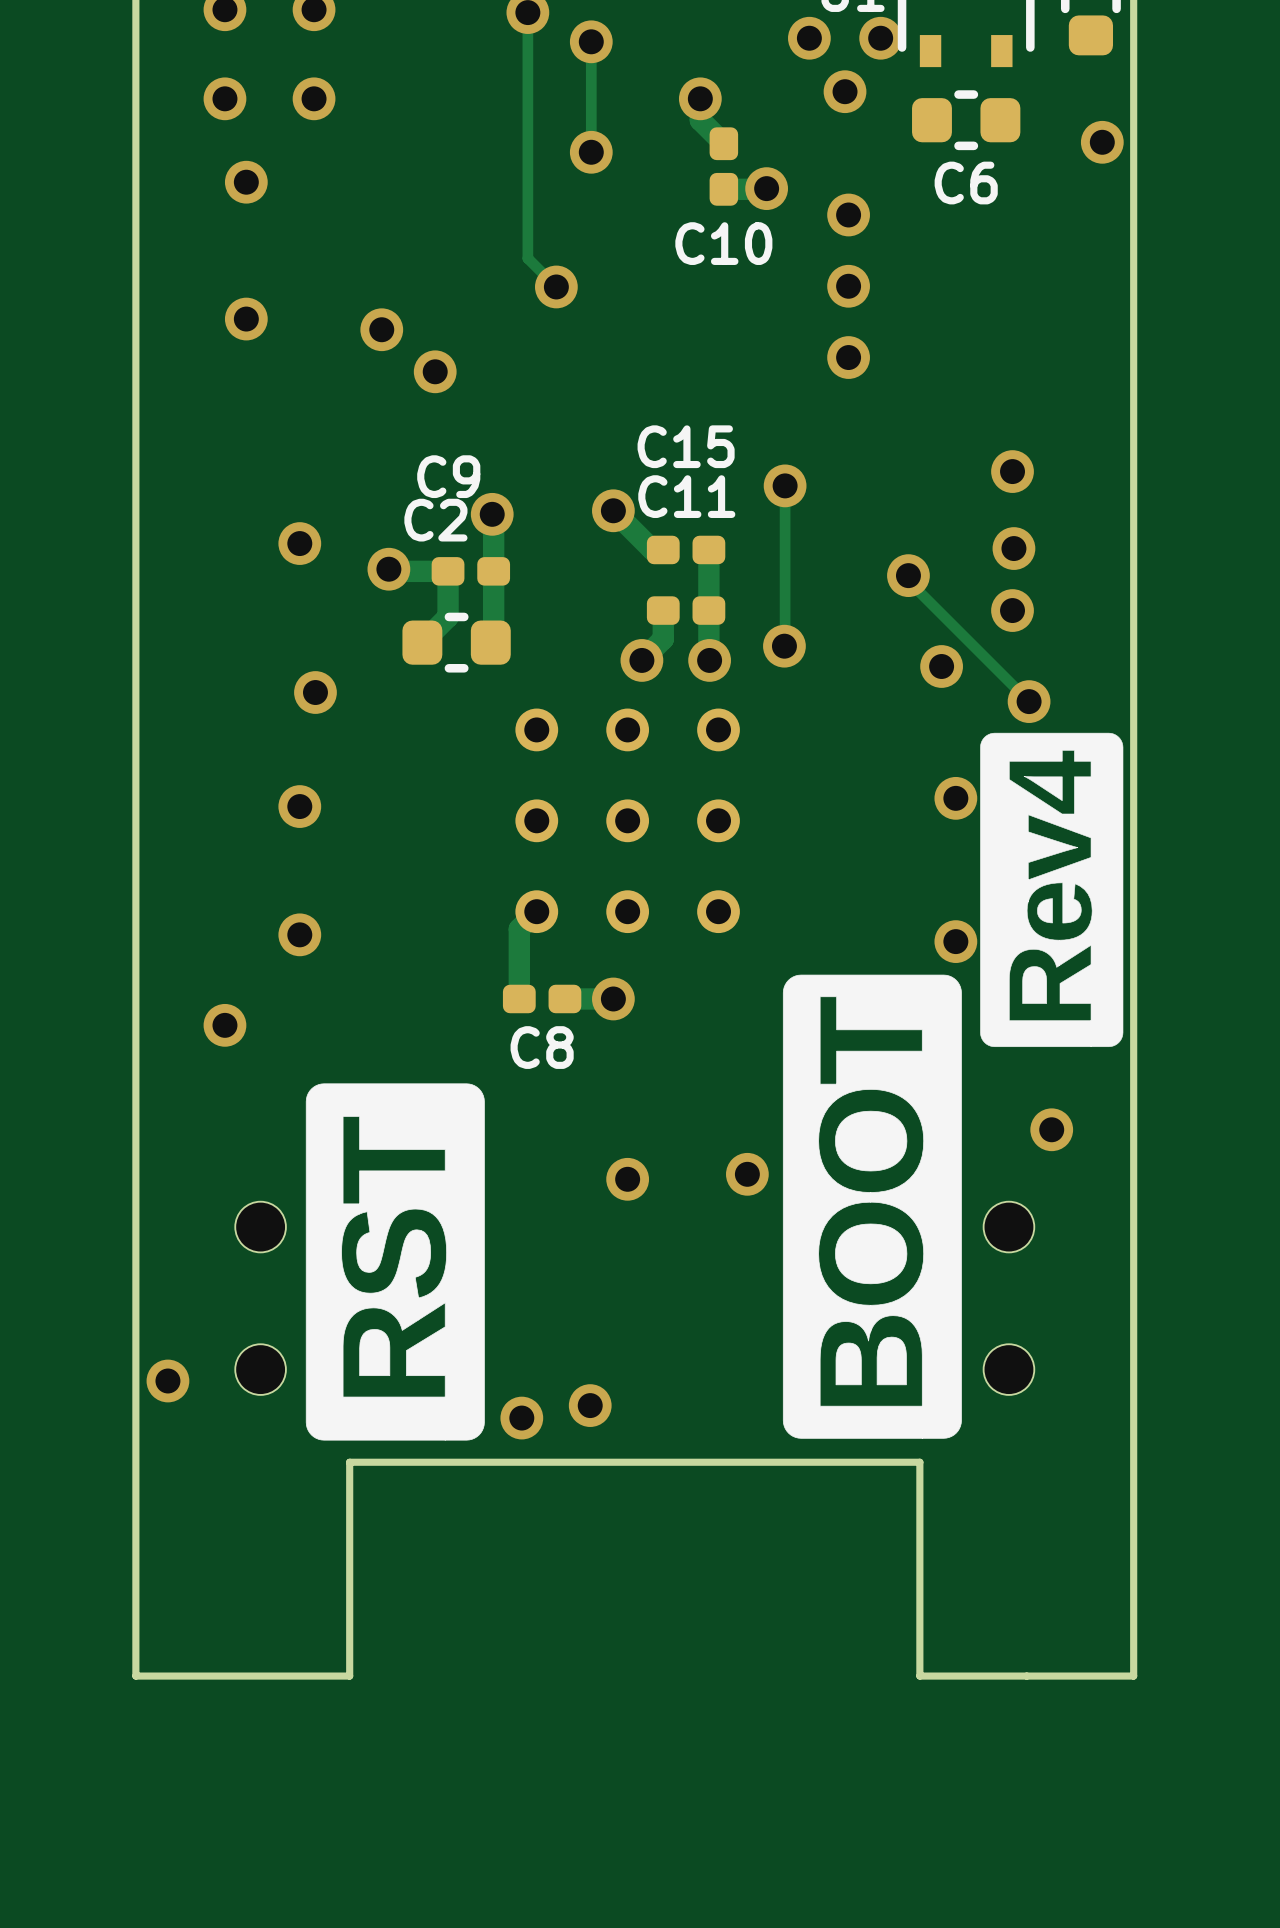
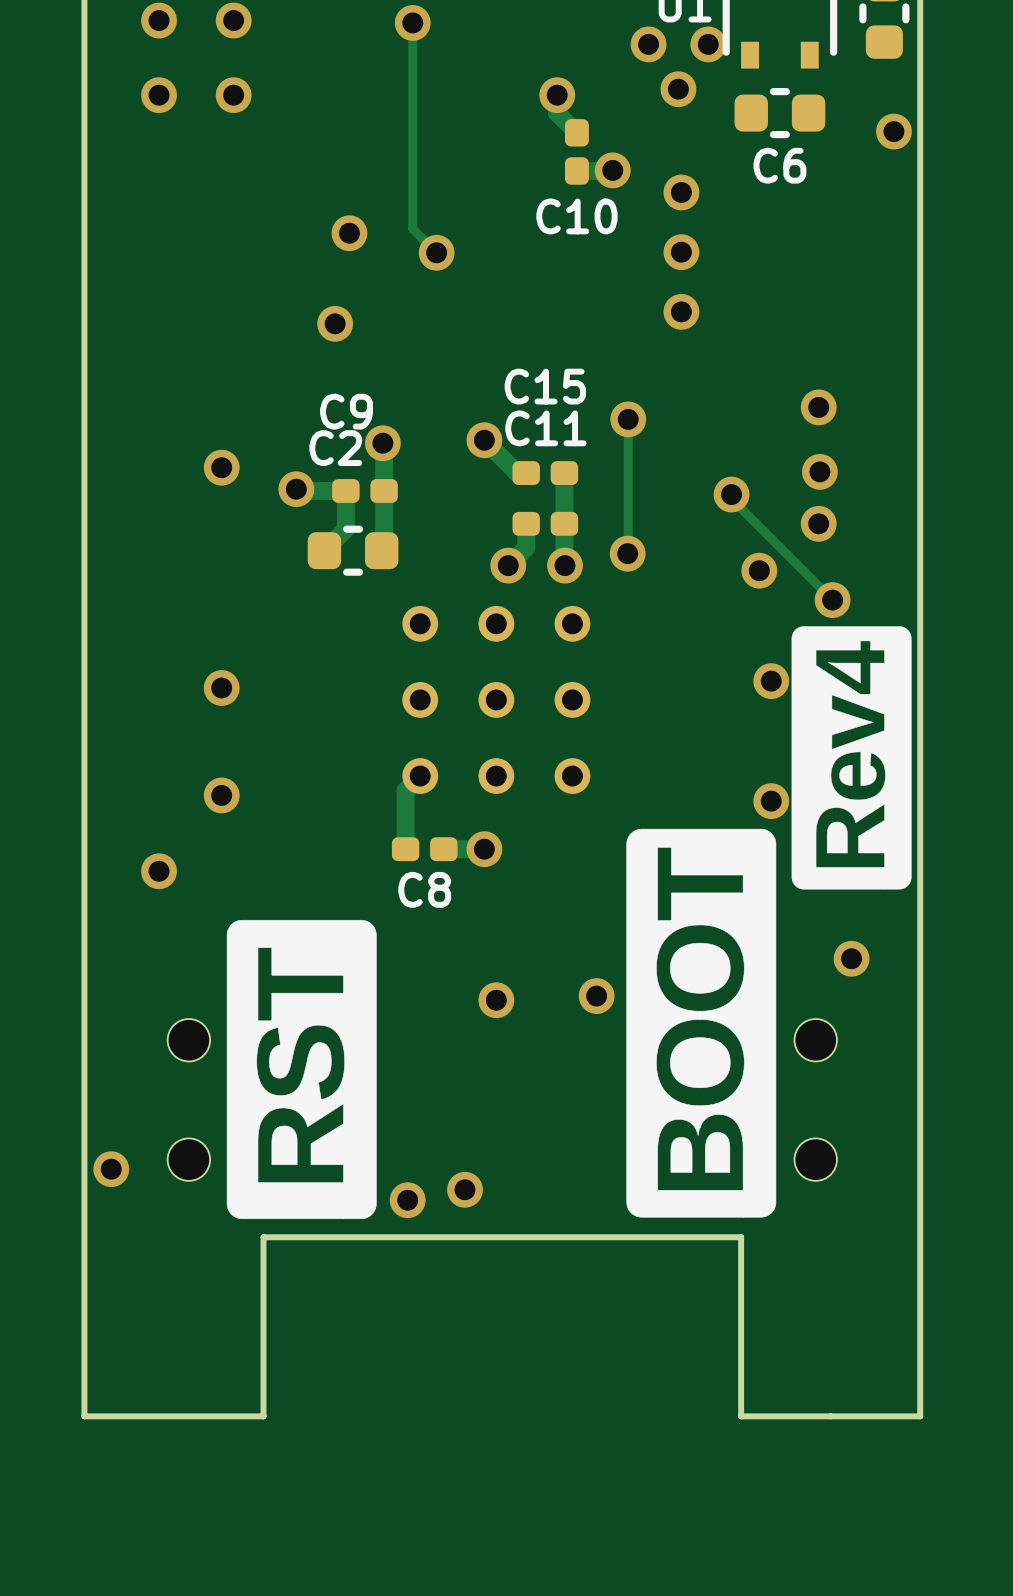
track: (591, 41) (591, 152) -> none
via: (591, 41) -> none
via: (591, 152) -> none
via: (246, 182) -> none
via: none -> (349, 233)
via: (246, 319) -> none
via: (381, 329) -> none
via: (315, 692) -> none

